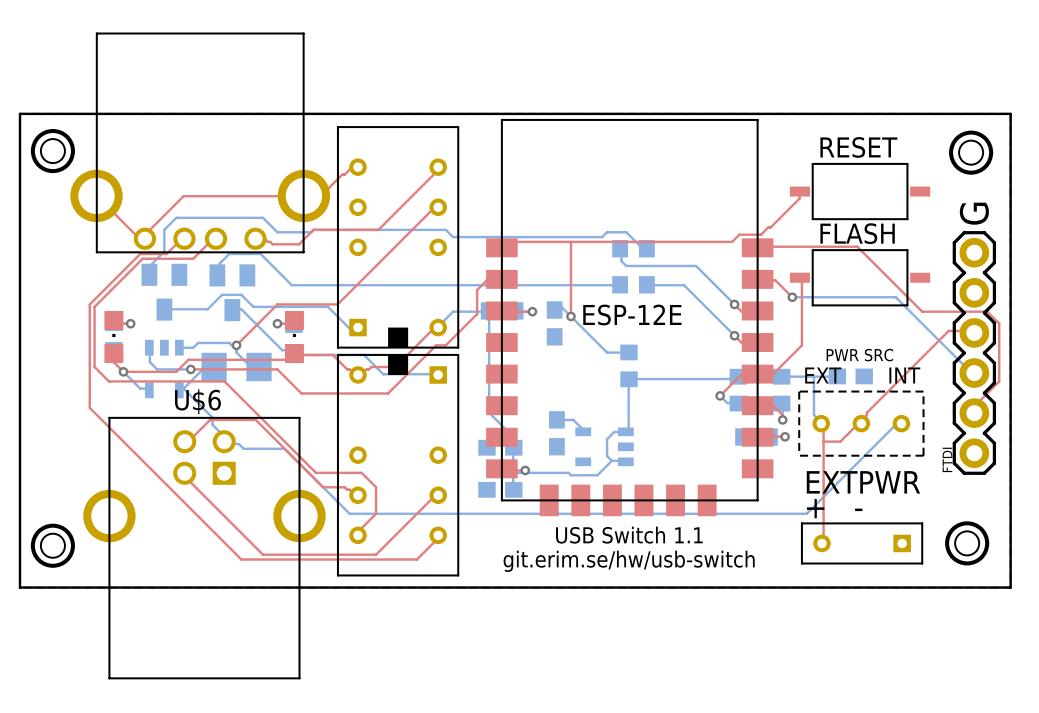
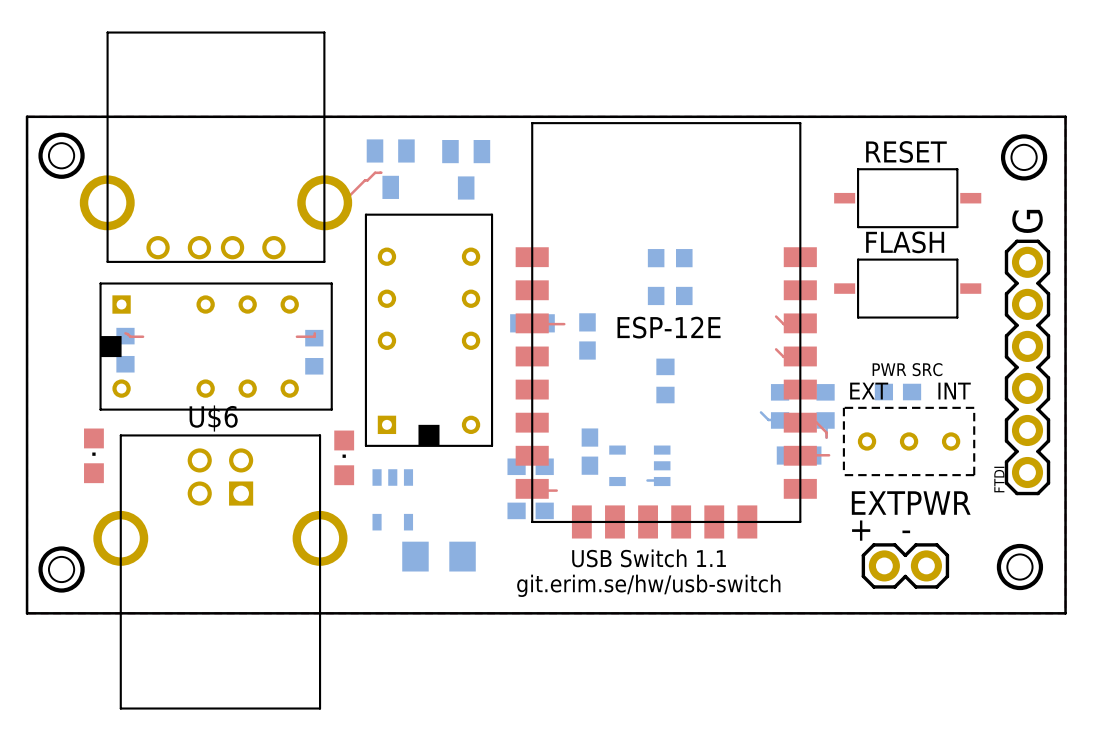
part: none -> (390, 169)
part: none -> (466, 169)
top track: (438, 167) (436, 167) (436, 172) (378, 229) (313, 229) (299, 244) (272, 244) (265, 239) (255, 238) -> none
top track: (799, 191) (799, 198) (761, 234) (739, 234) (732, 241) (508, 241) (501, 247) -> none
top track: (96, 195) (137, 237) (142, 237) -> none
top track: (303, 196) (183, 196) (142, 237) -> none
top track: (438, 207) (433, 208) (337, 304) (277, 304) (236, 345) -> none
part: (398, 237) -> none
top track: (184, 238) (183, 237) (166, 253) (140, 253) (89, 304) (89, 407) (241, 559) (416, 559) (436, 540) (436, 535) (438, 535) -> none
top track: (216, 238) (214, 237) (193, 258) (142, 258) (94, 306) (94, 367) (109, 381) (224, 381) (315, 472) (361, 472) (376, 487) (376, 513) (359, 530) (358, 535) -> none
top track: (570, 241) (570, 316) -> none
top track: (757, 247) (857, 246) (922, 311) (987, 311) (999, 323) (999, 381) (975, 405) (974, 413) -> none
bottom track: (620, 248) (621, 261) (626, 265) (696, 265) (734, 304) -> none
bottom track: (646, 248) (640, 246) (626, 232) (607, 232) (602, 237) (453, 237) (445, 229) (313, 229) (311, 232) (277, 232) (263, 217) (176, 217) (164, 229) (164, 251) (149, 265) (149, 274) -> none
bottom track: (217, 275) (219, 273) (219, 263) (229, 253) (260, 253) (291, 285) (620, 284) -> none
top track: (799, 277) (801, 277) (801, 345) (773, 374) (741, 374) (720, 395) -> none
top track: (501, 279) (486, 280) (477, 290) (477, 314) (445, 345) (436, 345) (388, 393) (301, 393) (277, 369) (190, 369) -> none
top track: (757, 279) (775, 280) (792, 297) -> none
bottom track: (646, 284) (684, 285) (734, 335) -> none
part: (164, 292) -> none
part: (232, 292) -> none
bottom track: (792, 297) (895, 297) (972, 374) (974, 373) -> none
via: (792, 297) -> none
via: (734, 304) -> none
bottom track: (164, 309) (207, 309) (222, 294) (241, 294) (253, 306) (327, 306) (349, 328) (358, 327) -> none
bottom track: (232, 310) (241, 309) (282, 350) (291, 350) (296, 354) (364, 354) (383, 374) (438, 374) -> none
bottom track: (554, 310) (561, 306) (607, 352) (628, 352) -> none
via: (532, 311) -> none
via: (570, 316) -> none
part: none -> (428, 330)
via: (130, 323) -> none
via: (277, 323) -> none
bottom track: (438, 327) (453, 311) (489, 311) (489, 412) (515, 439) (515, 446) (513, 448) (513, 489) -> none
top track: (438, 327) (433, 328) (395, 367) (371, 367) (359, 376) (347, 369) (332, 354) (294, 353) (291, 359) (188, 359) (176, 371) (123, 371) (113, 362) (113, 353) -> none
top track: (974, 332) (972, 330) (948, 330) (866, 412) (859, 422) (861, 423) (857, 424) (840, 441) (823, 441) -> none
part: none -> (216, 346)
via: (734, 335) -> none
part position: (113, 337) -> (93, 455)
part position: (294, 337) -> (344, 457)
via: (236, 345) -> none
bottom track: (149, 347) (149, 362) (157, 369) (190, 369) -> none
bottom track: (179, 347) (193, 347) (198, 342) (229, 342) (250, 367) (258, 367) -> none
bottom track: (214, 367) (205, 367) (183, 388) -> none
part position: (236, 367) -> (439, 556)
part position: (164, 369) -> (392, 499)
via: (190, 369) -> none
bottom track: (123, 371) (140, 388) (149, 390) -> none
via: (123, 371) -> none
bottom track: (813, 376) (813, 415) (821, 423) -> none
bottom track: (837, 376) (628, 379) (628, 429) (626, 431) (614, 431) (607, 439) (607, 456) (611, 460) (597, 475) (570, 475) (568, 472) (513, 472) -> none
bottom track: (183, 388) (212, 417) (212, 424) (222, 434) (222, 441) (224, 444) (238, 444) (243, 448) (284, 448) (349, 513) (806, 513) (895, 424) (901, 423) -> none
via: (720, 395) -> none
bottom track: (556, 419) (573, 419) (583, 431) -> none
via: (782, 419) -> none
top track: (821, 423) (823, 424) (823, 542) (821, 543) -> none
via: (785, 436) -> none
top track: (184, 441) (186, 444) (210, 419) (255, 419) (323, 487) (344, 487) (358, 495) -> none
part: (398, 465) -> none
via: (525, 470) -> none
top track: (184, 473) (183, 475) (263, 554) (376, 554) (433, 496) (438, 495) -> none
part footprint: [800, 522, 924, 565] -> [861, 543, 950, 589]
text position: USB Switch 1.1 (629, 535) -> USB Switch 1.1 (649, 558)
text position: git.erim.se/hw/usb-switch (629, 561) -> git.erim.se/hw/usb-switch (648, 585)

